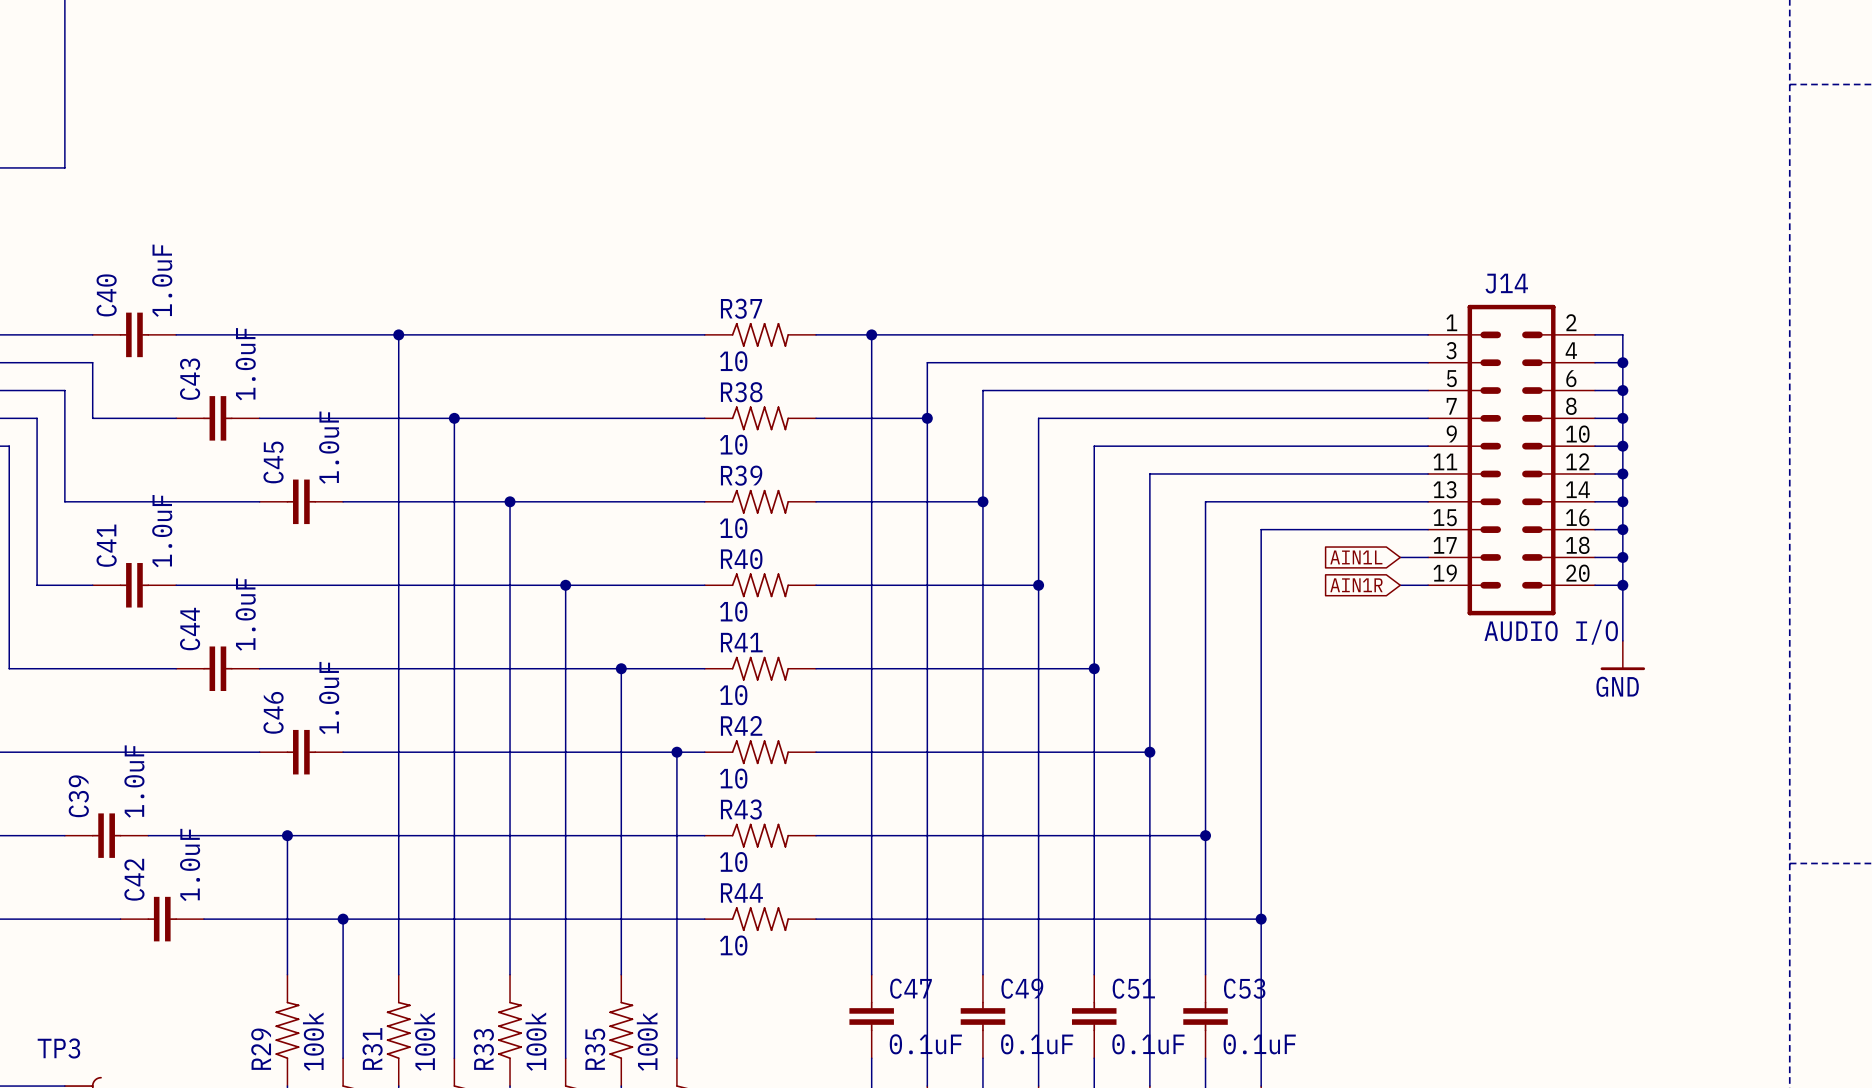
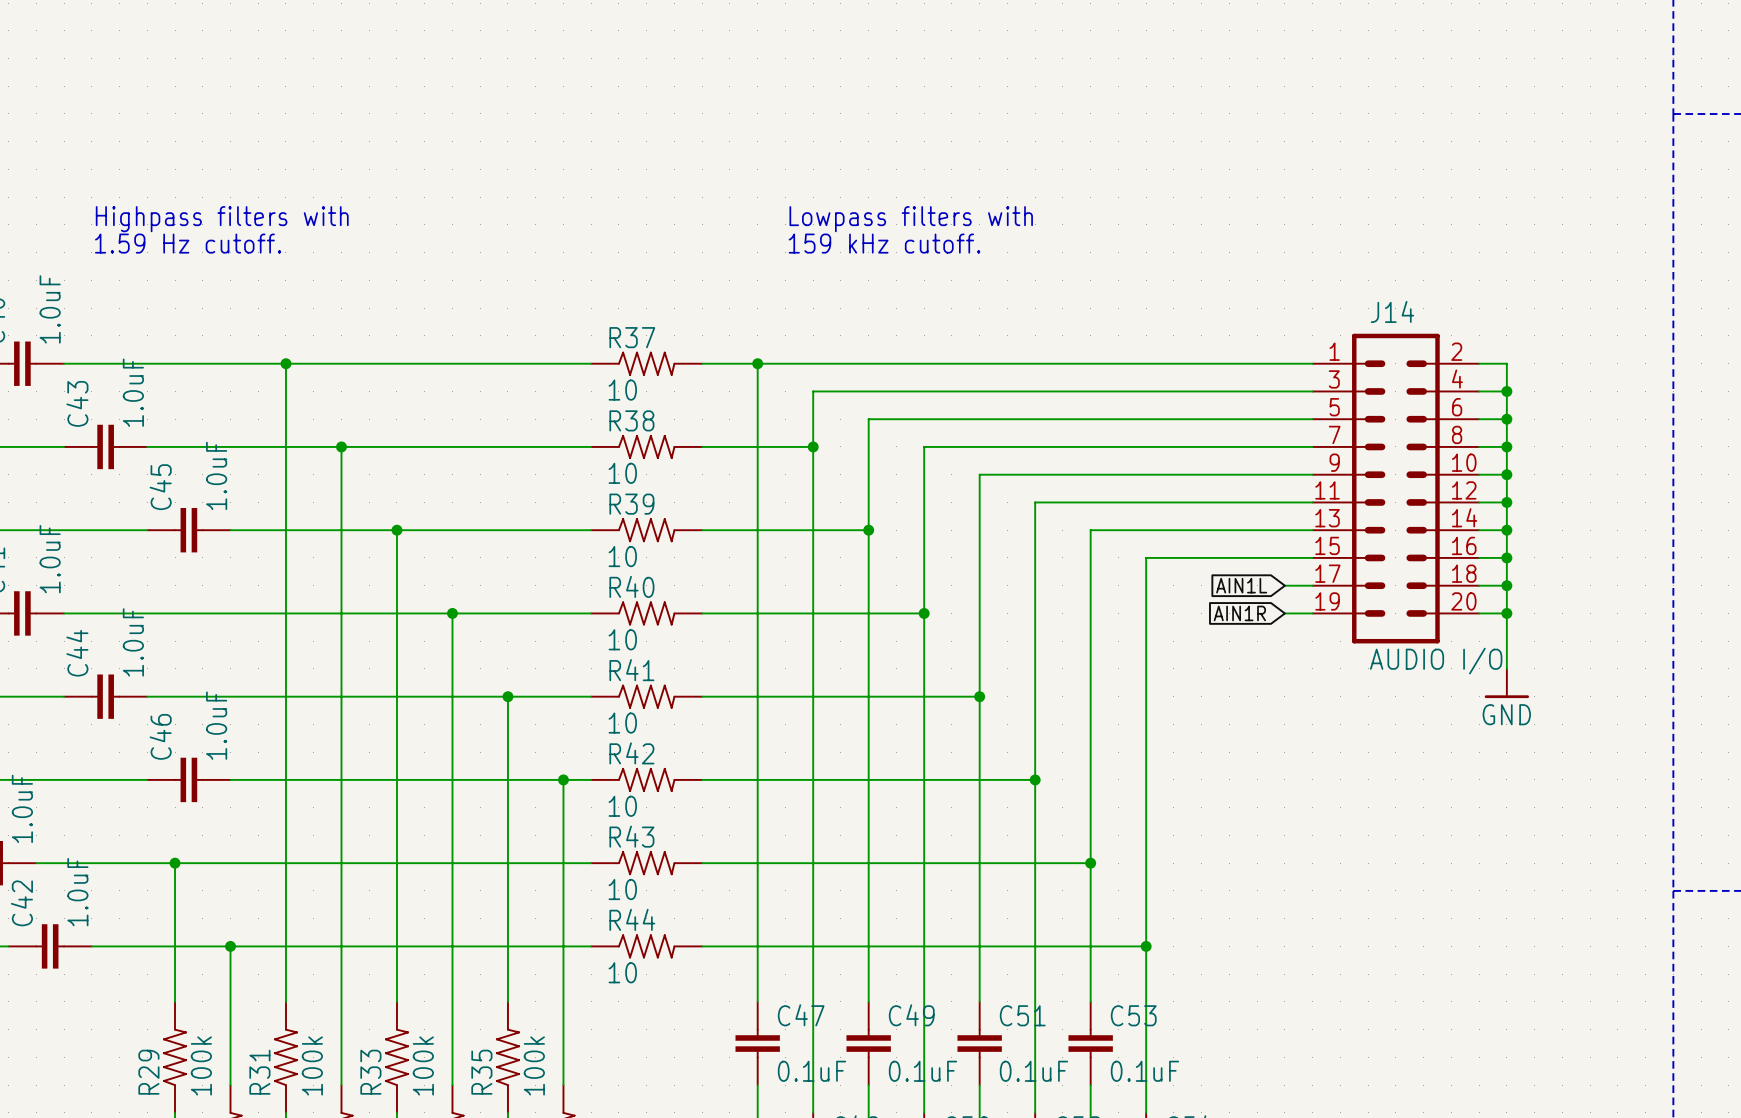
text: none -> Lowpass filters with (911, 219)
text: none -> Highpass filters with (222, 219)
text: none -> 1.59 Hz cutoff. (188, 243)
text: none -> 159 kHz cutoff. (884, 243)

